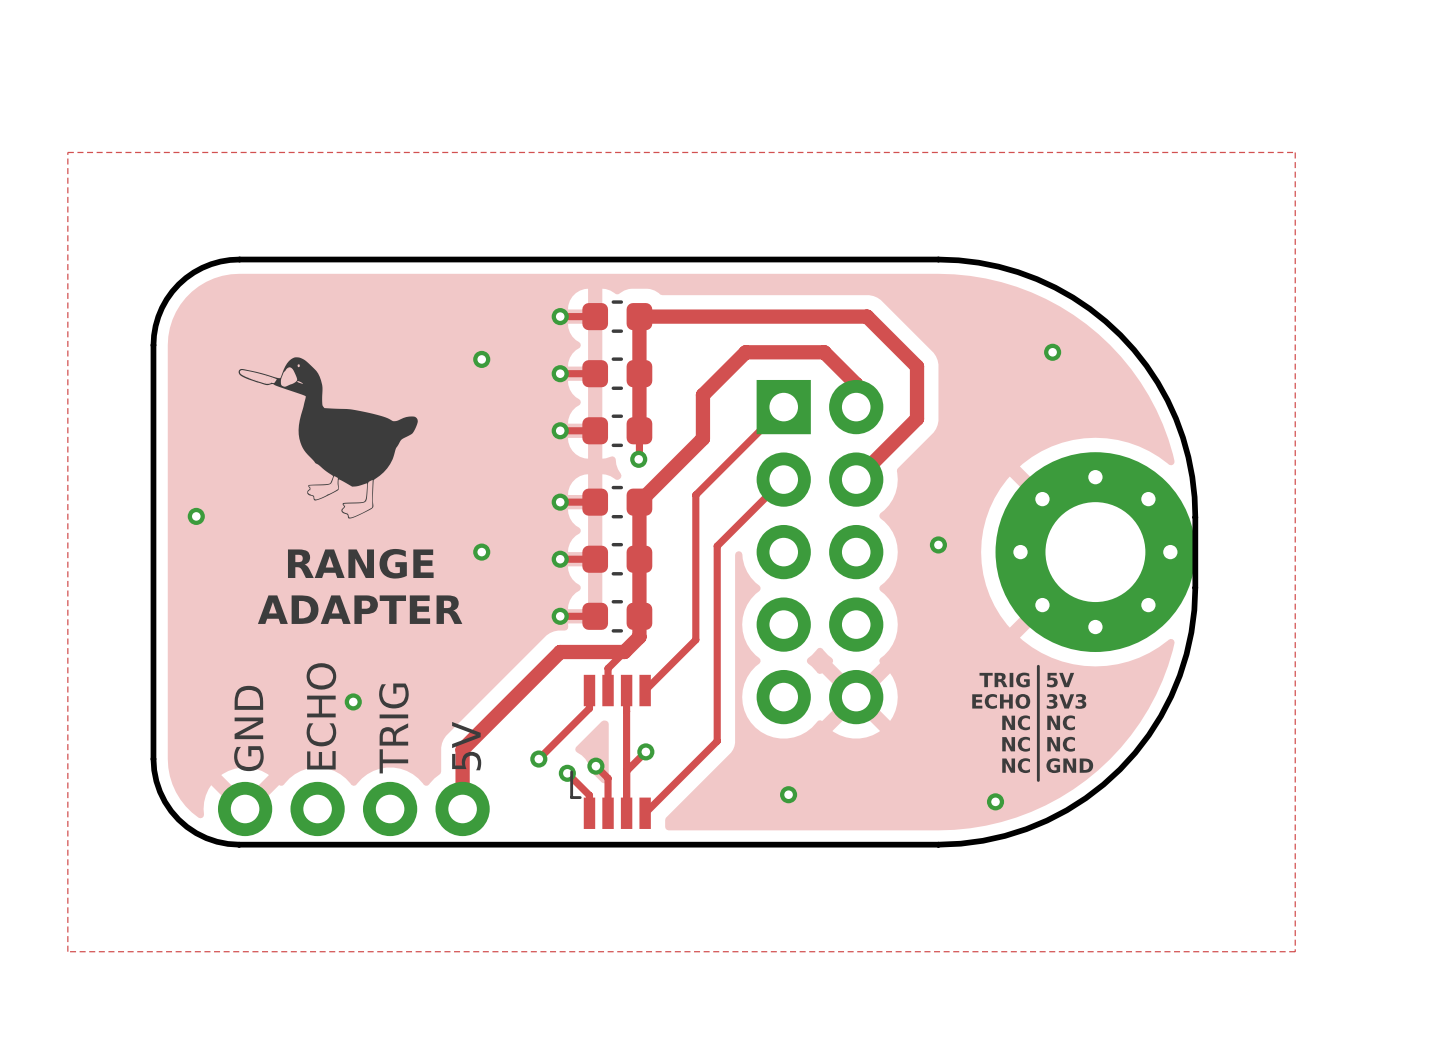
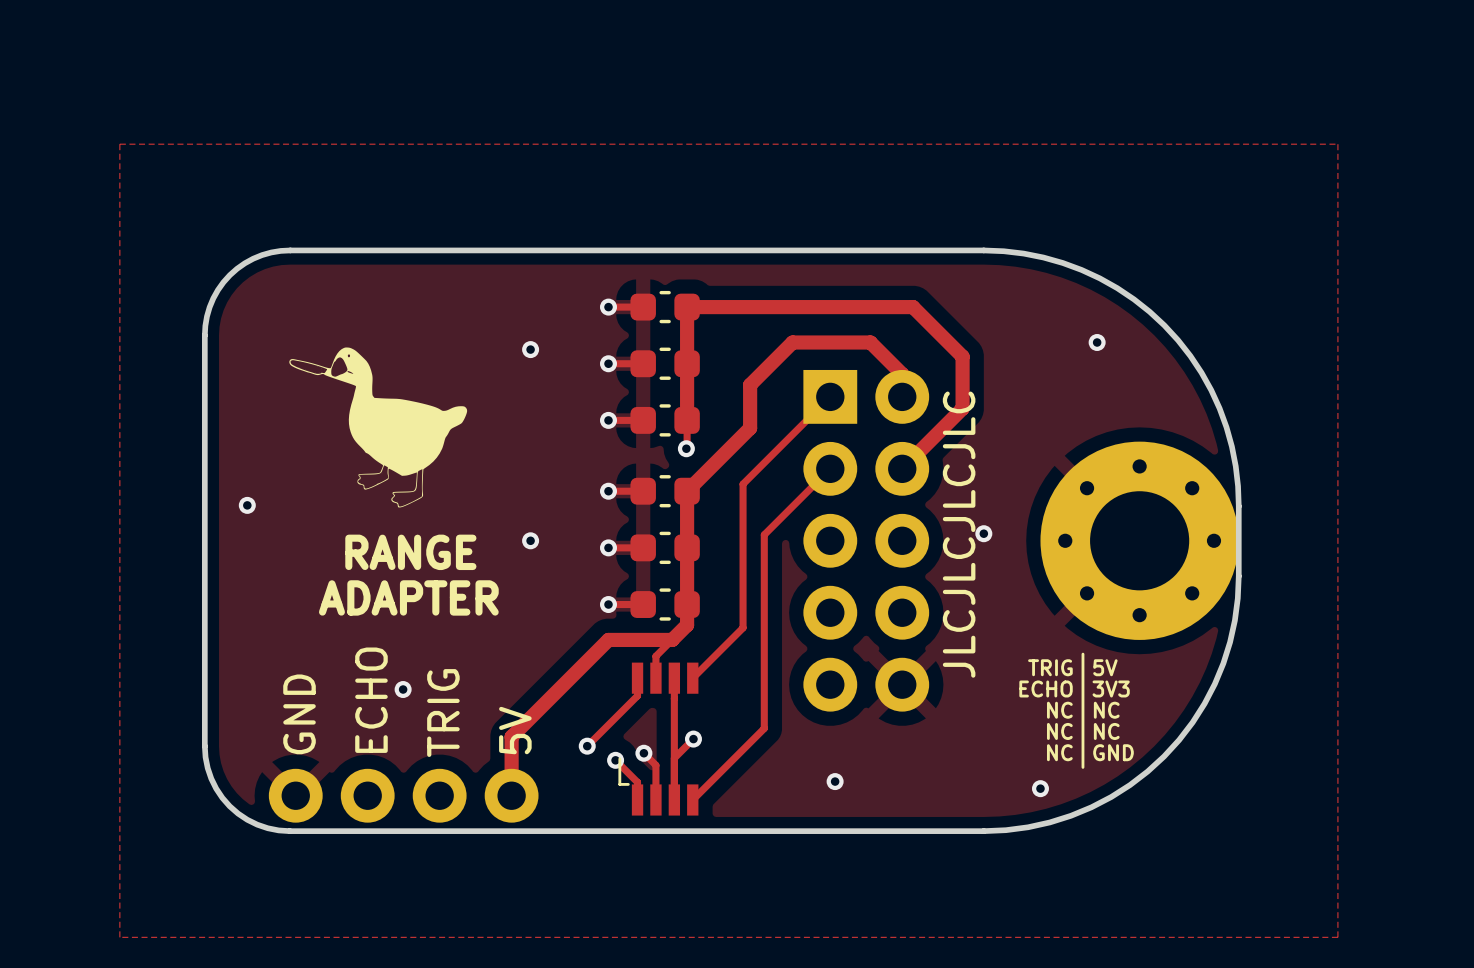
text: none -> JLCJLCJLCJLC (959, 534)

